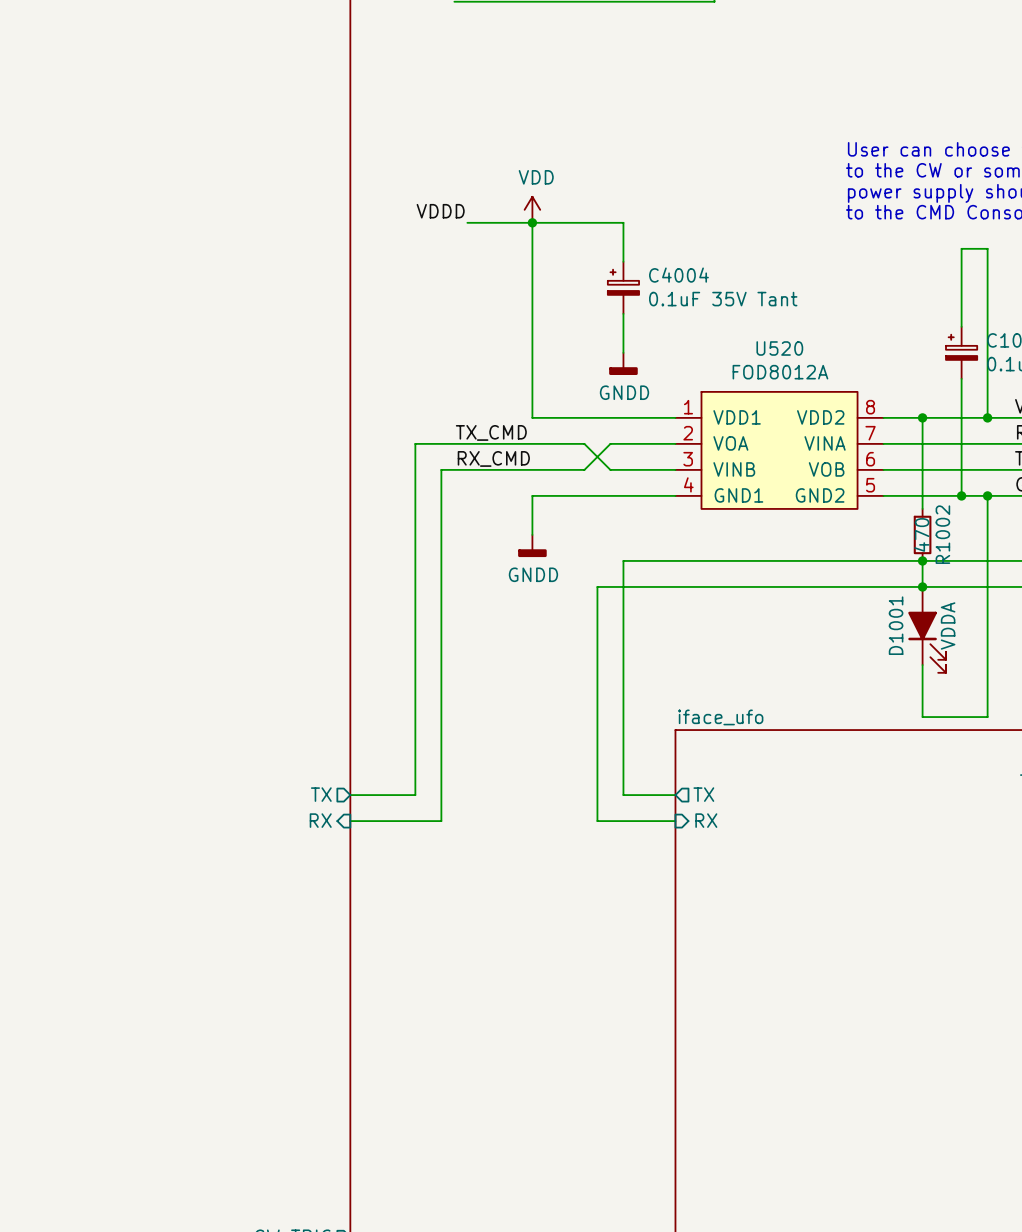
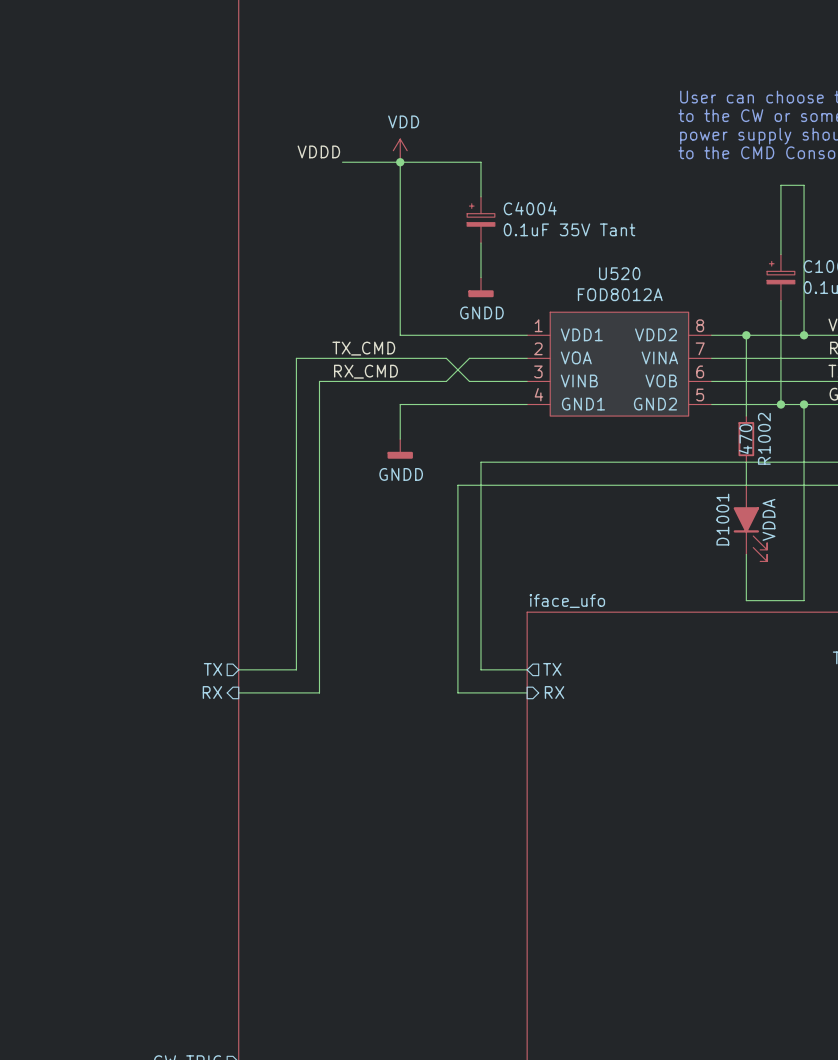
junction: (922, 560) -> none
junction: (922, 586) -> none

